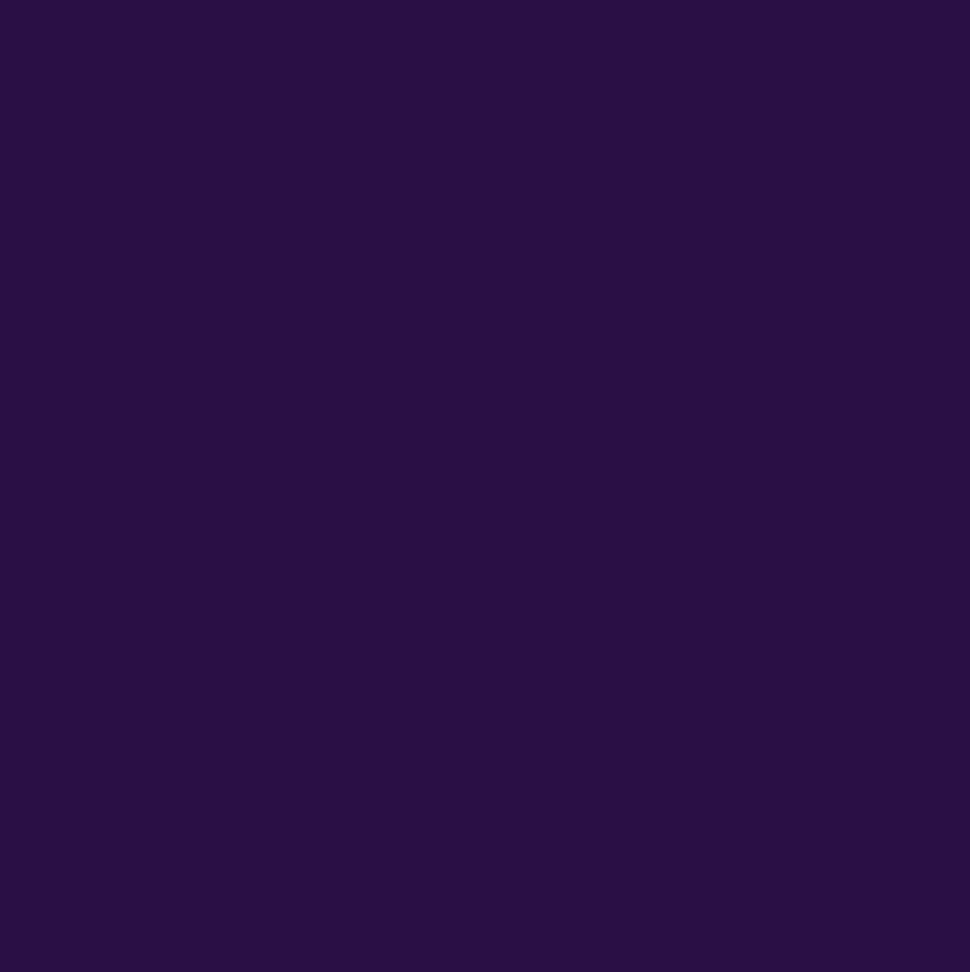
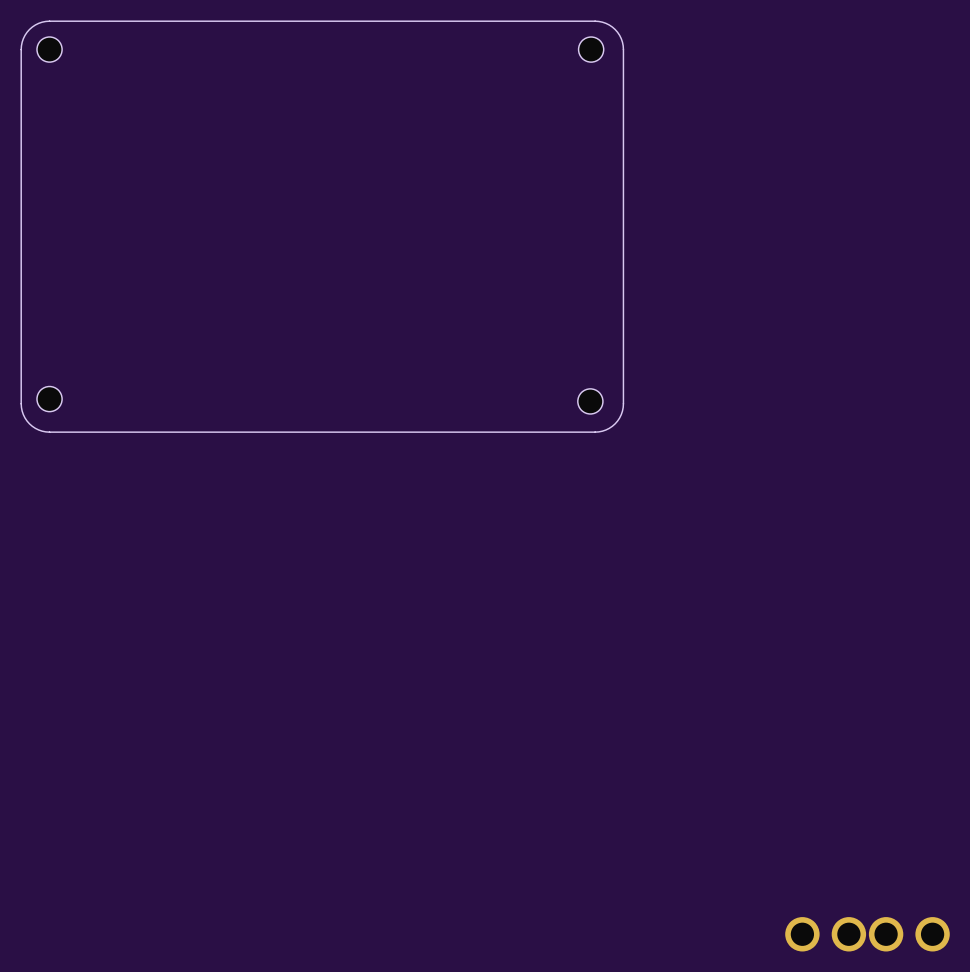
board edge: none -> (595, 21) (49, 21) (32, 27) (25, 35) (21, 49) (21, 403) (27, 421) (35, 428) (49, 432) (595, 432) (612, 426) (619, 417) (623, 403) (623, 49) (621, 38) (615, 29) (605, 23) (595, 21)
part: none -> (49, 49)
part: none -> (591, 49)
part: none -> (49, 399)
part: none -> (590, 401)
part: none -> (867, 934)

